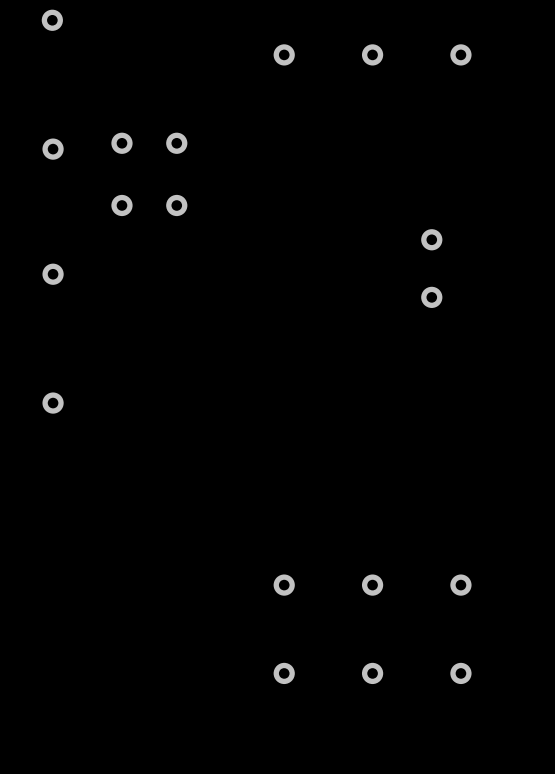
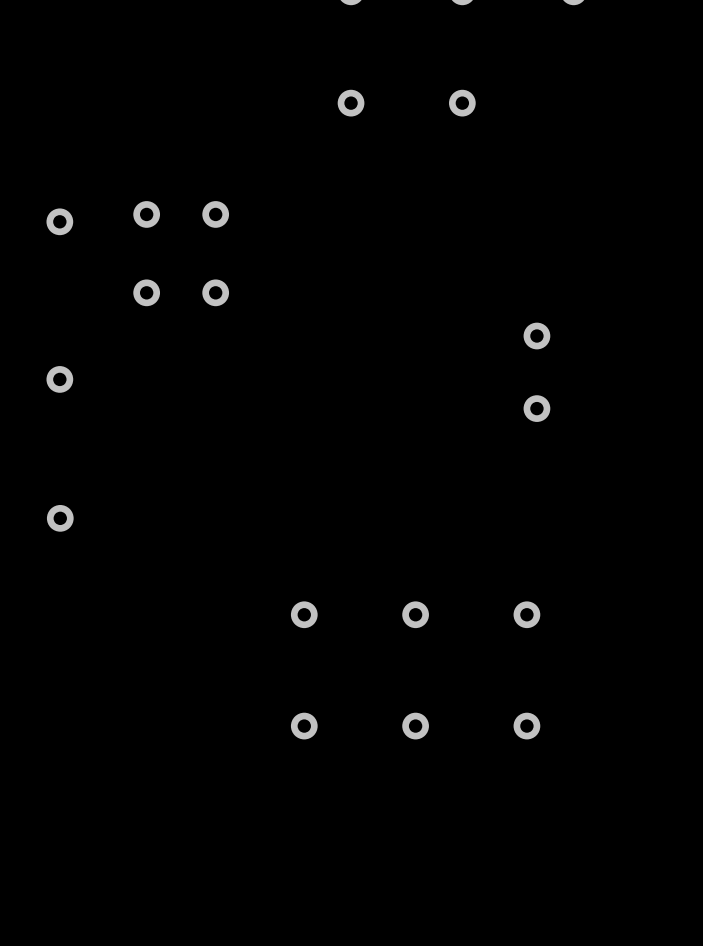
via: (52, 20) -> none
via: (460, 54) -> none
via position: (53, 403) -> (60, 518)
via: none -> (304, 614)
via: none -> (415, 614)
via: none -> (526, 614)
via: none -> (304, 726)
via: none -> (415, 726)
via: none -> (526, 726)
via: (284, 585) -> none
via: (372, 585) -> none
via: (460, 585) -> none
via: (284, 673) -> none
via: (372, 673) -> none
via: (460, 673) -> none

